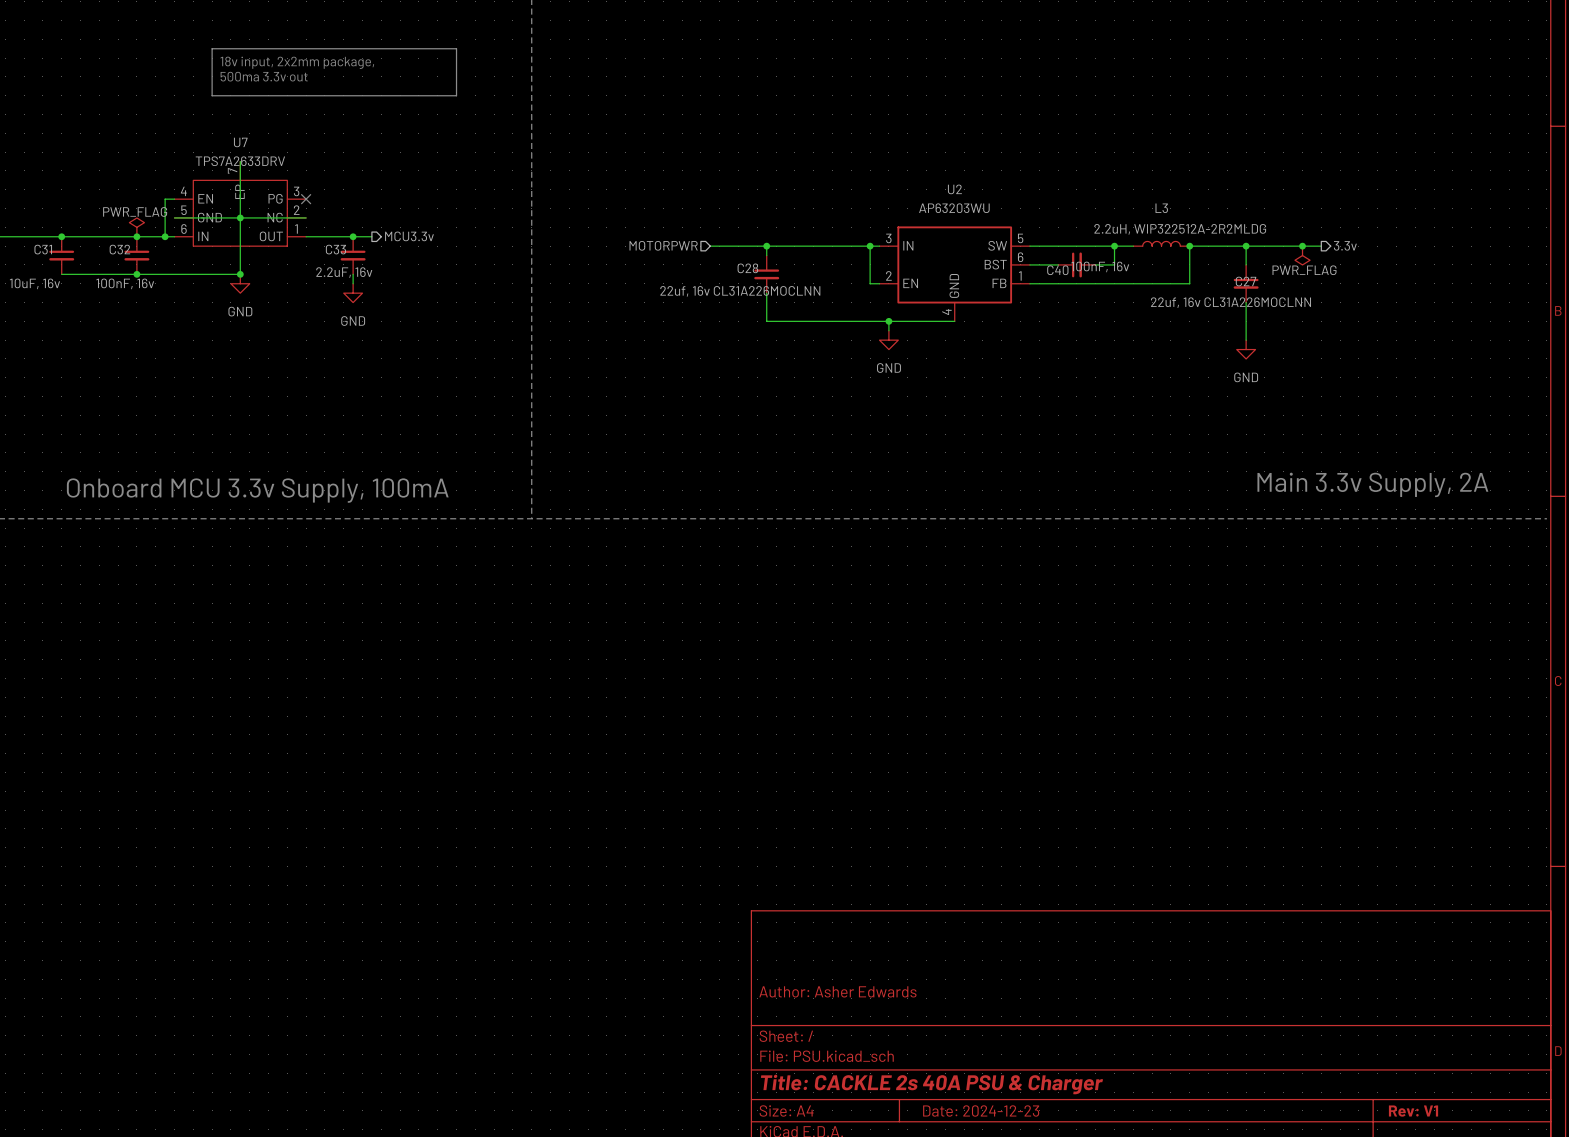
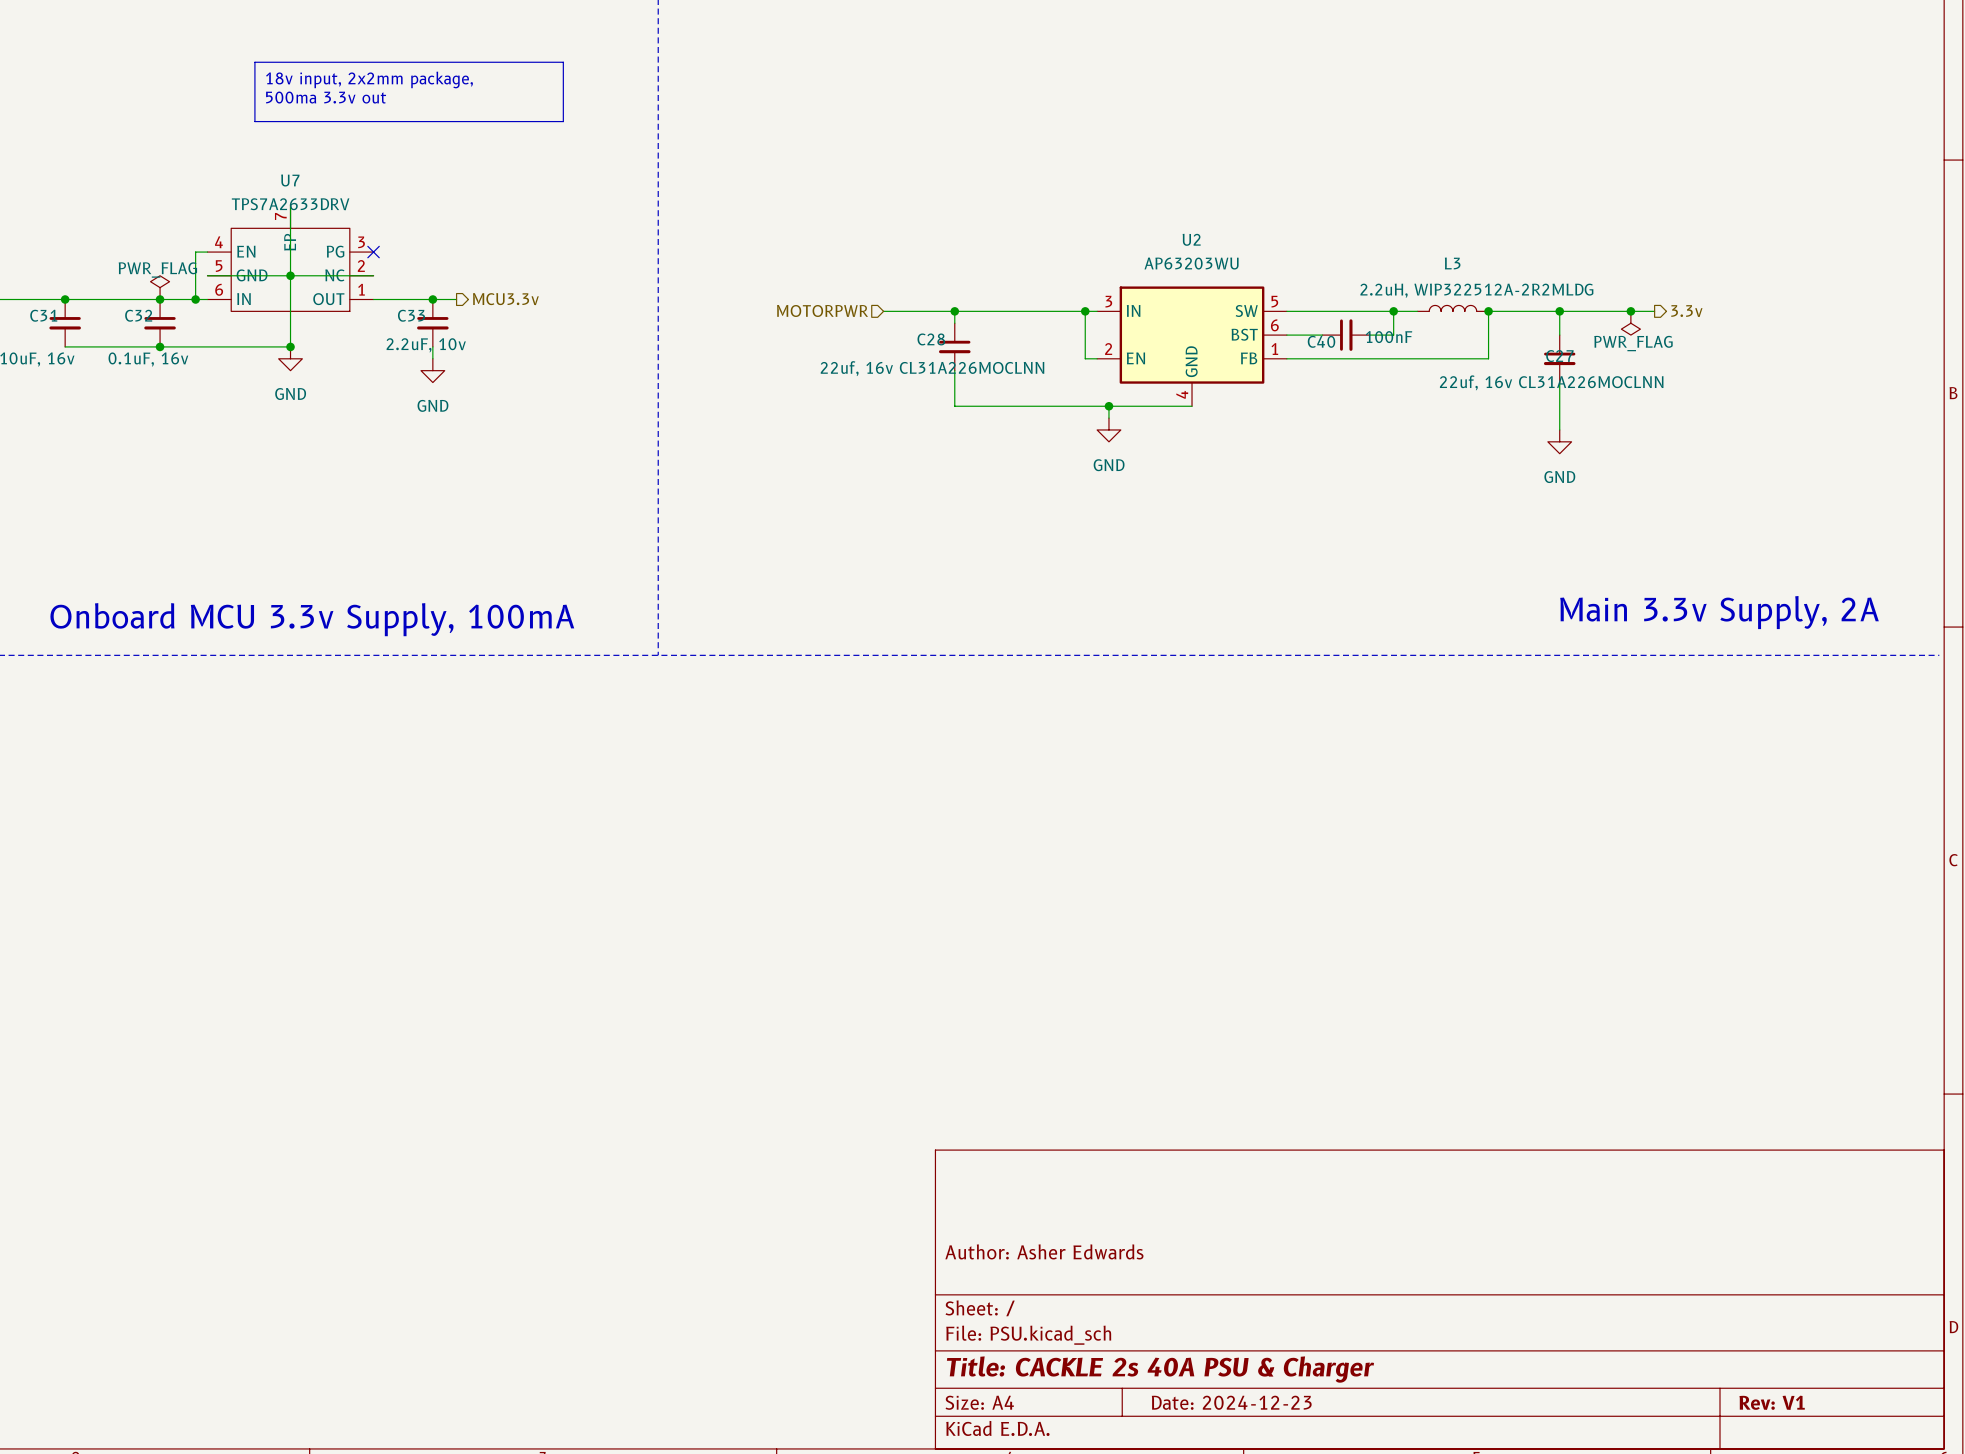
C40 value: 100nF, 16v (1100, 266) -> 100nF (1389, 337)
C33 value: 2.2uF, 16v (344, 272) -> 2.2uF, 10v (426, 345)
C32 value: 100nF, 16v (125, 283) -> 0.1uF, 16v (148, 359)

